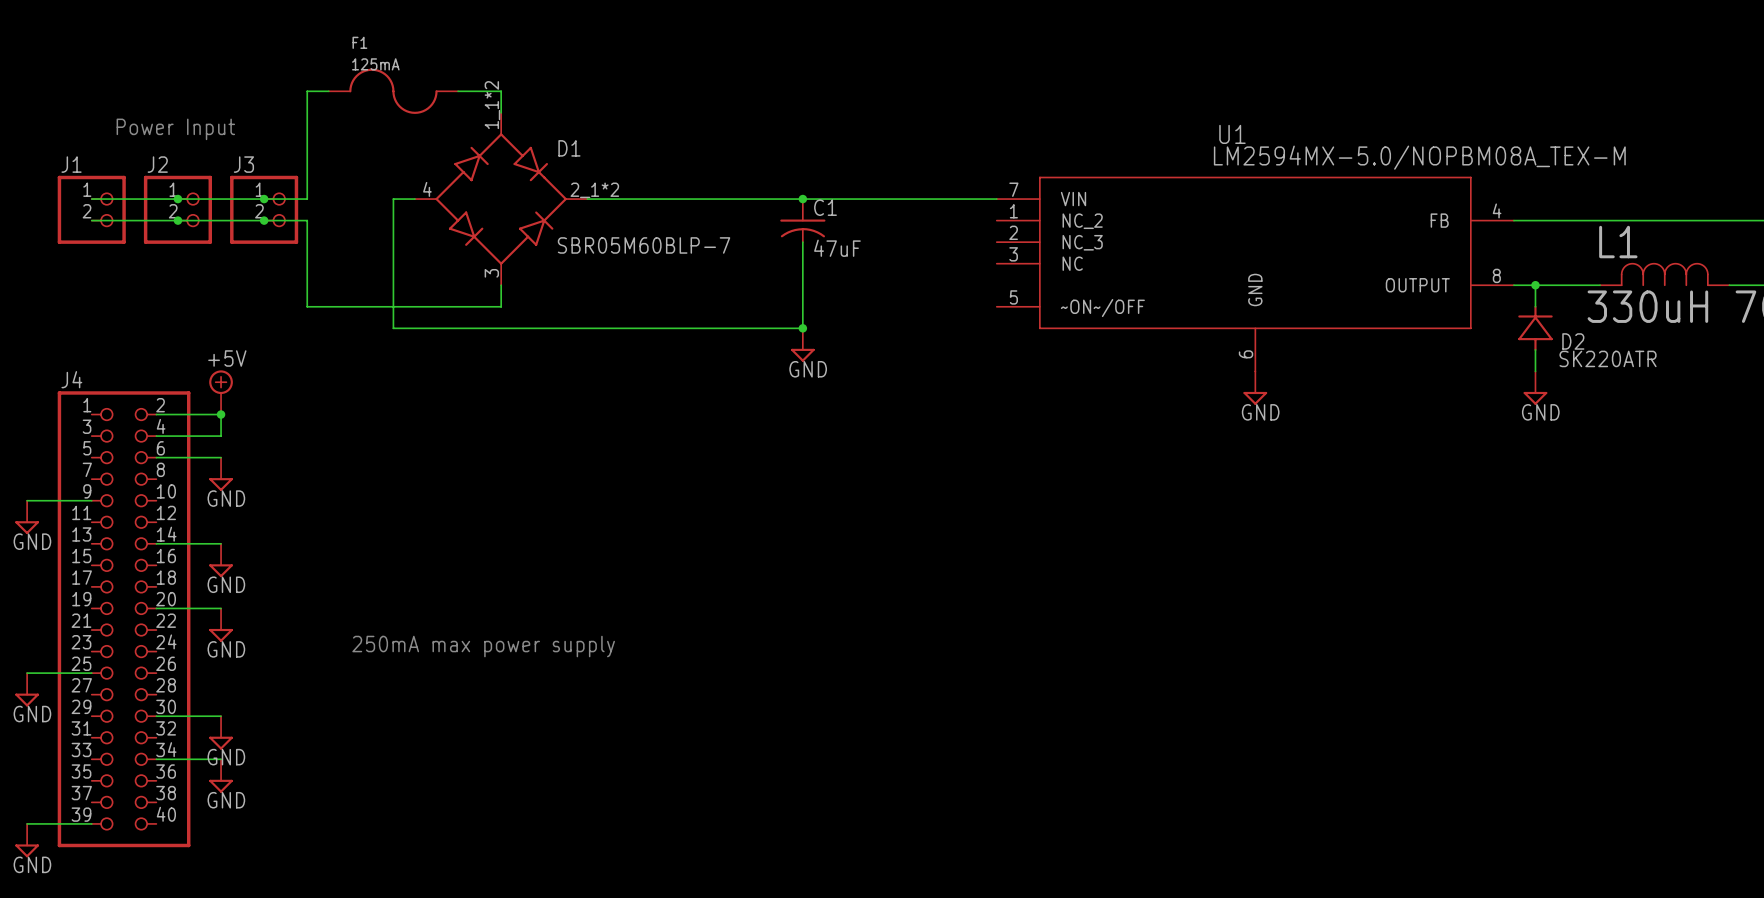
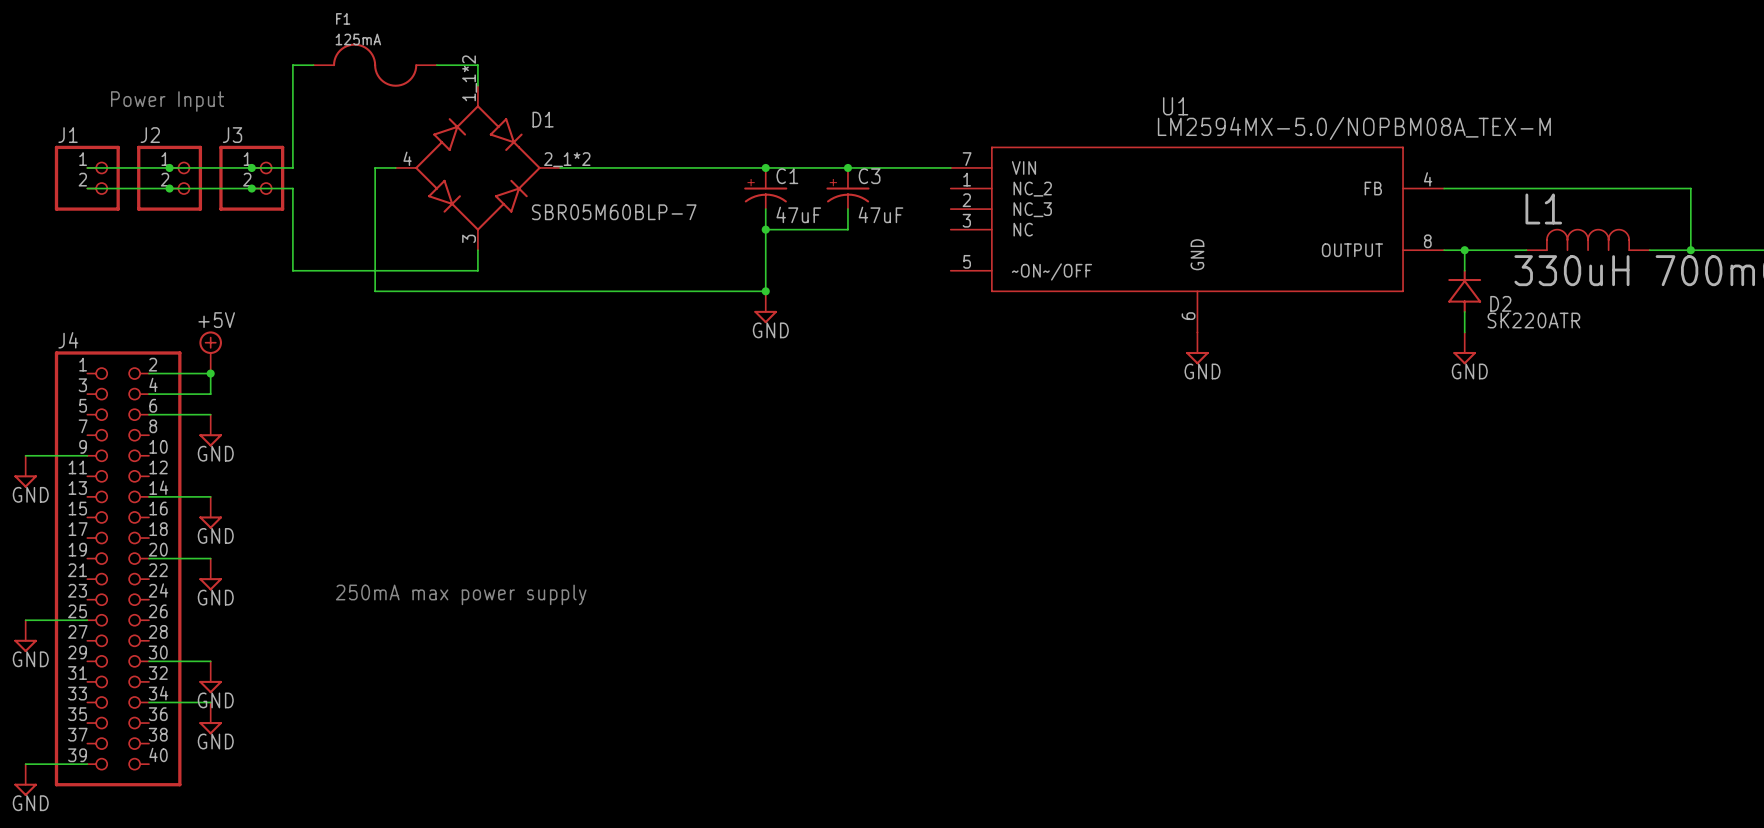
C1 symbol: [780, 199, 826, 243] -> [744, 167, 788, 210]
junction: none -> (847, 167)
C3: none -> 47uF (847, 188)
wire: none -> (847, 209) (847, 229) (765, 229)
junction: none -> (765, 229)

